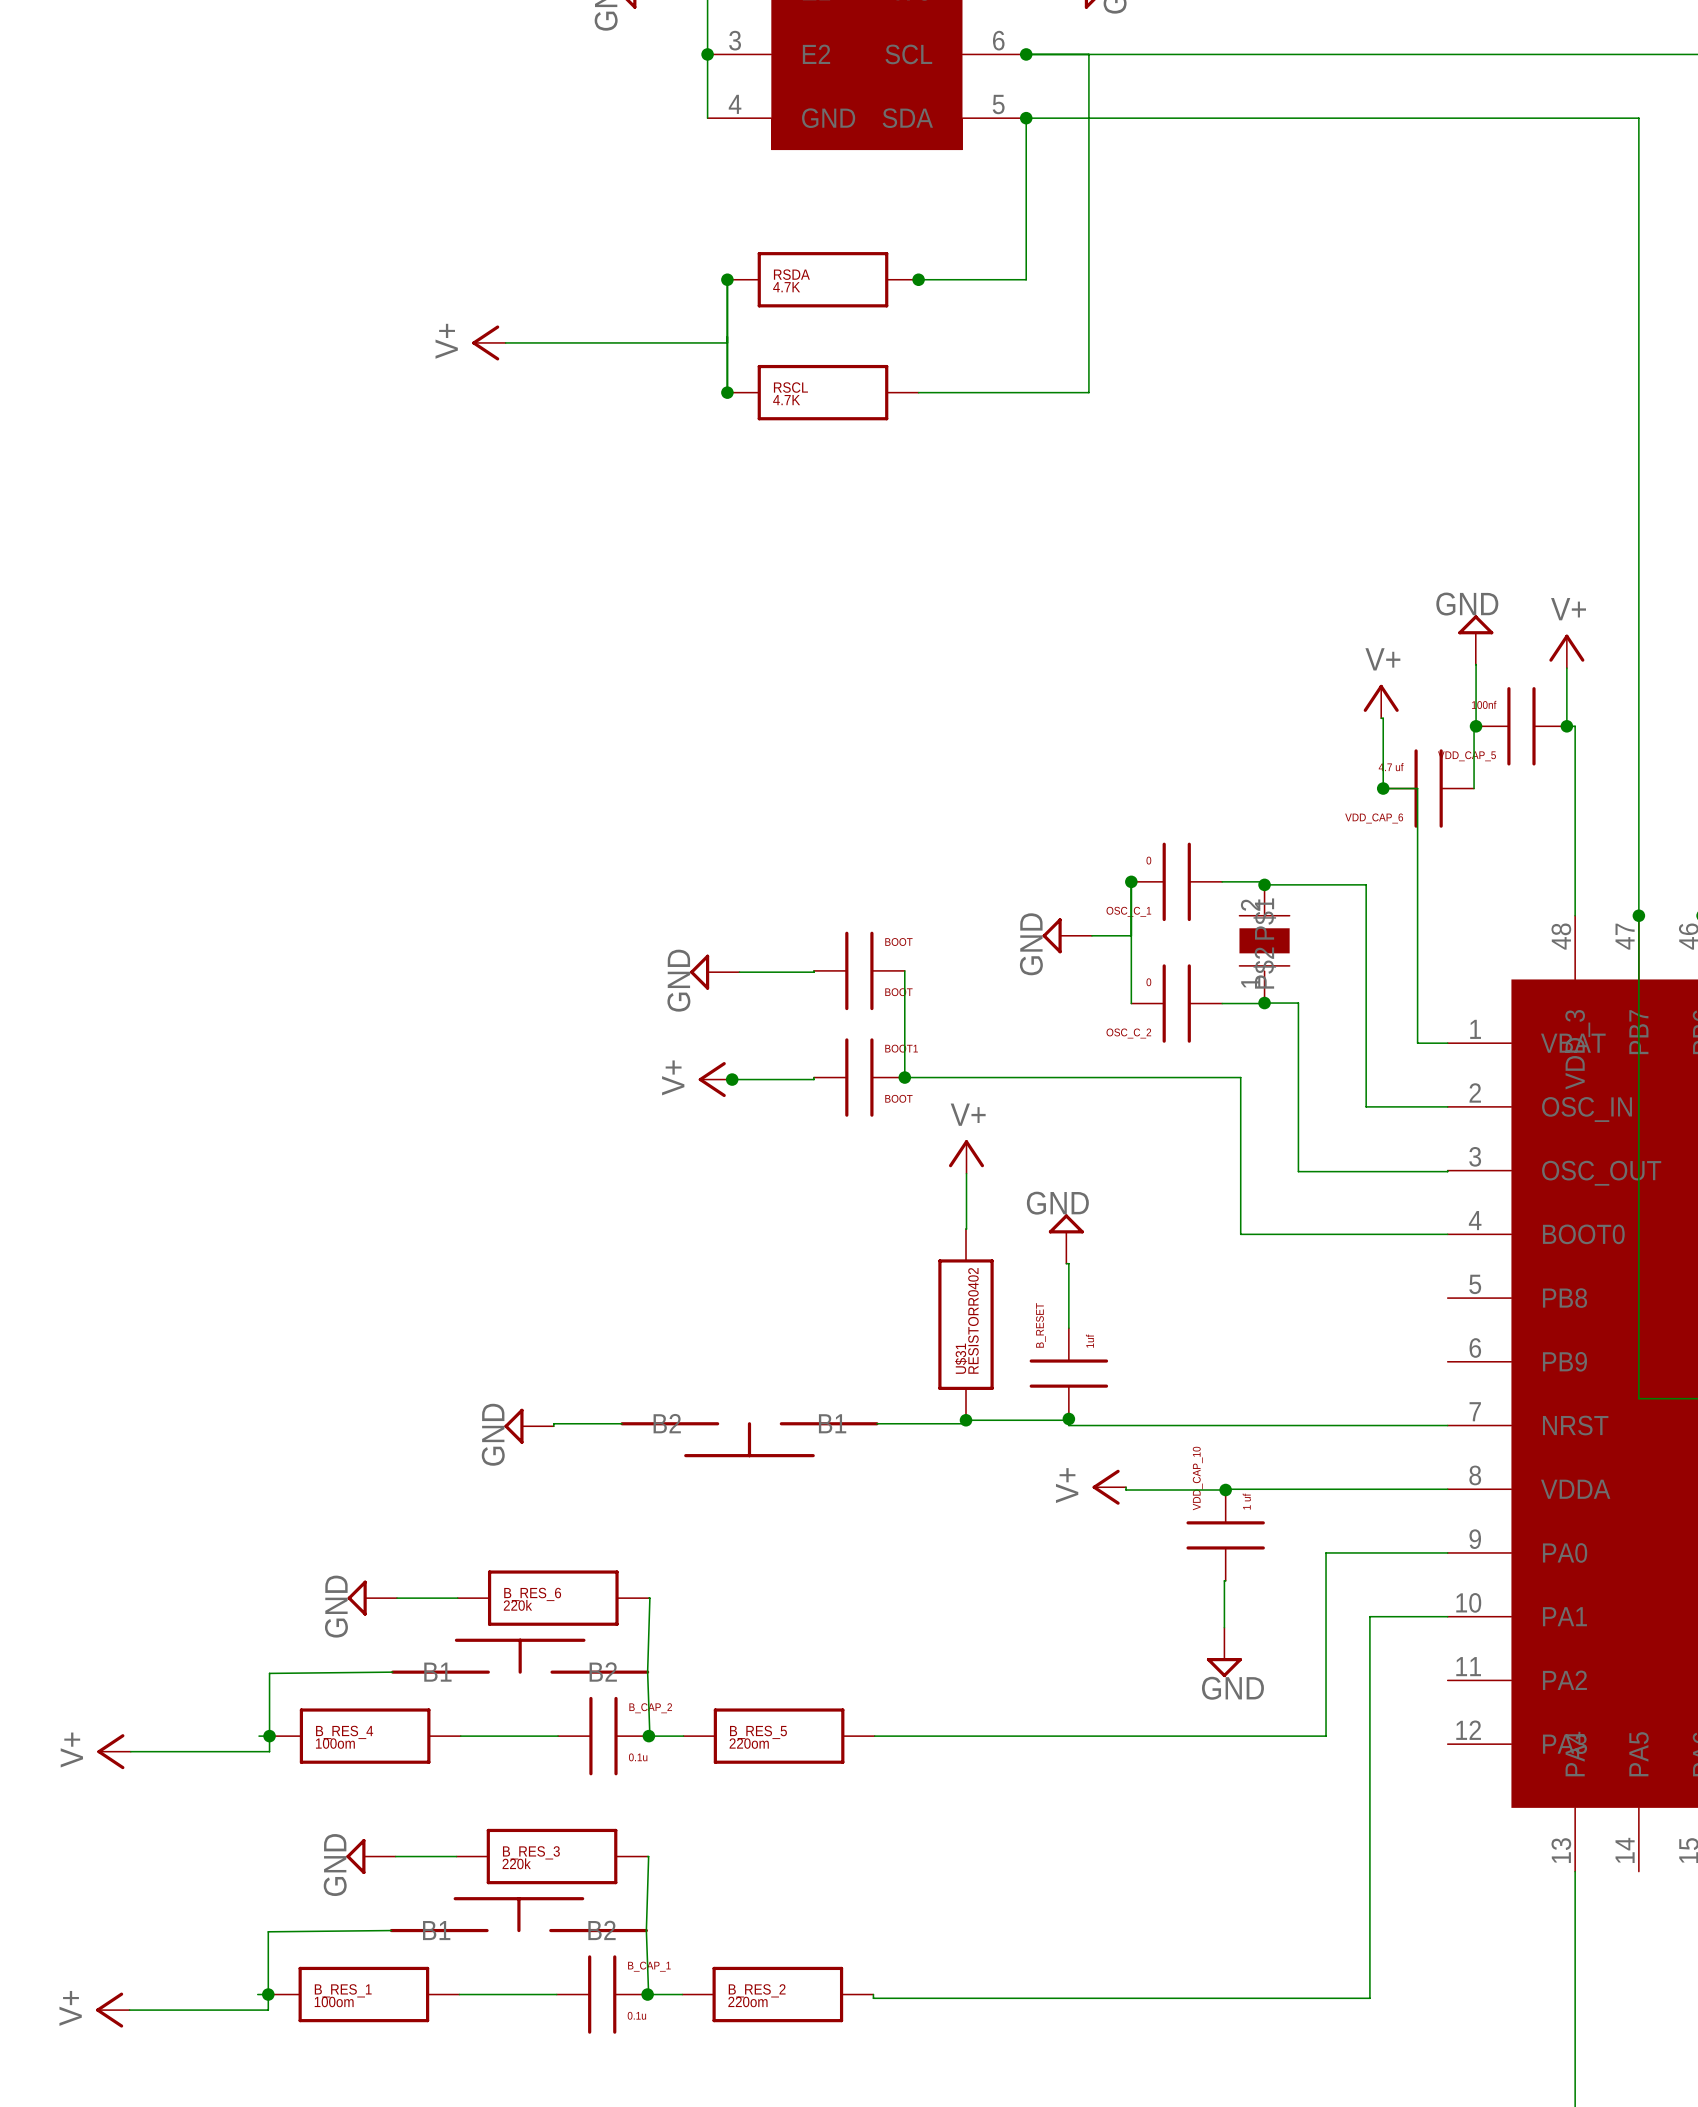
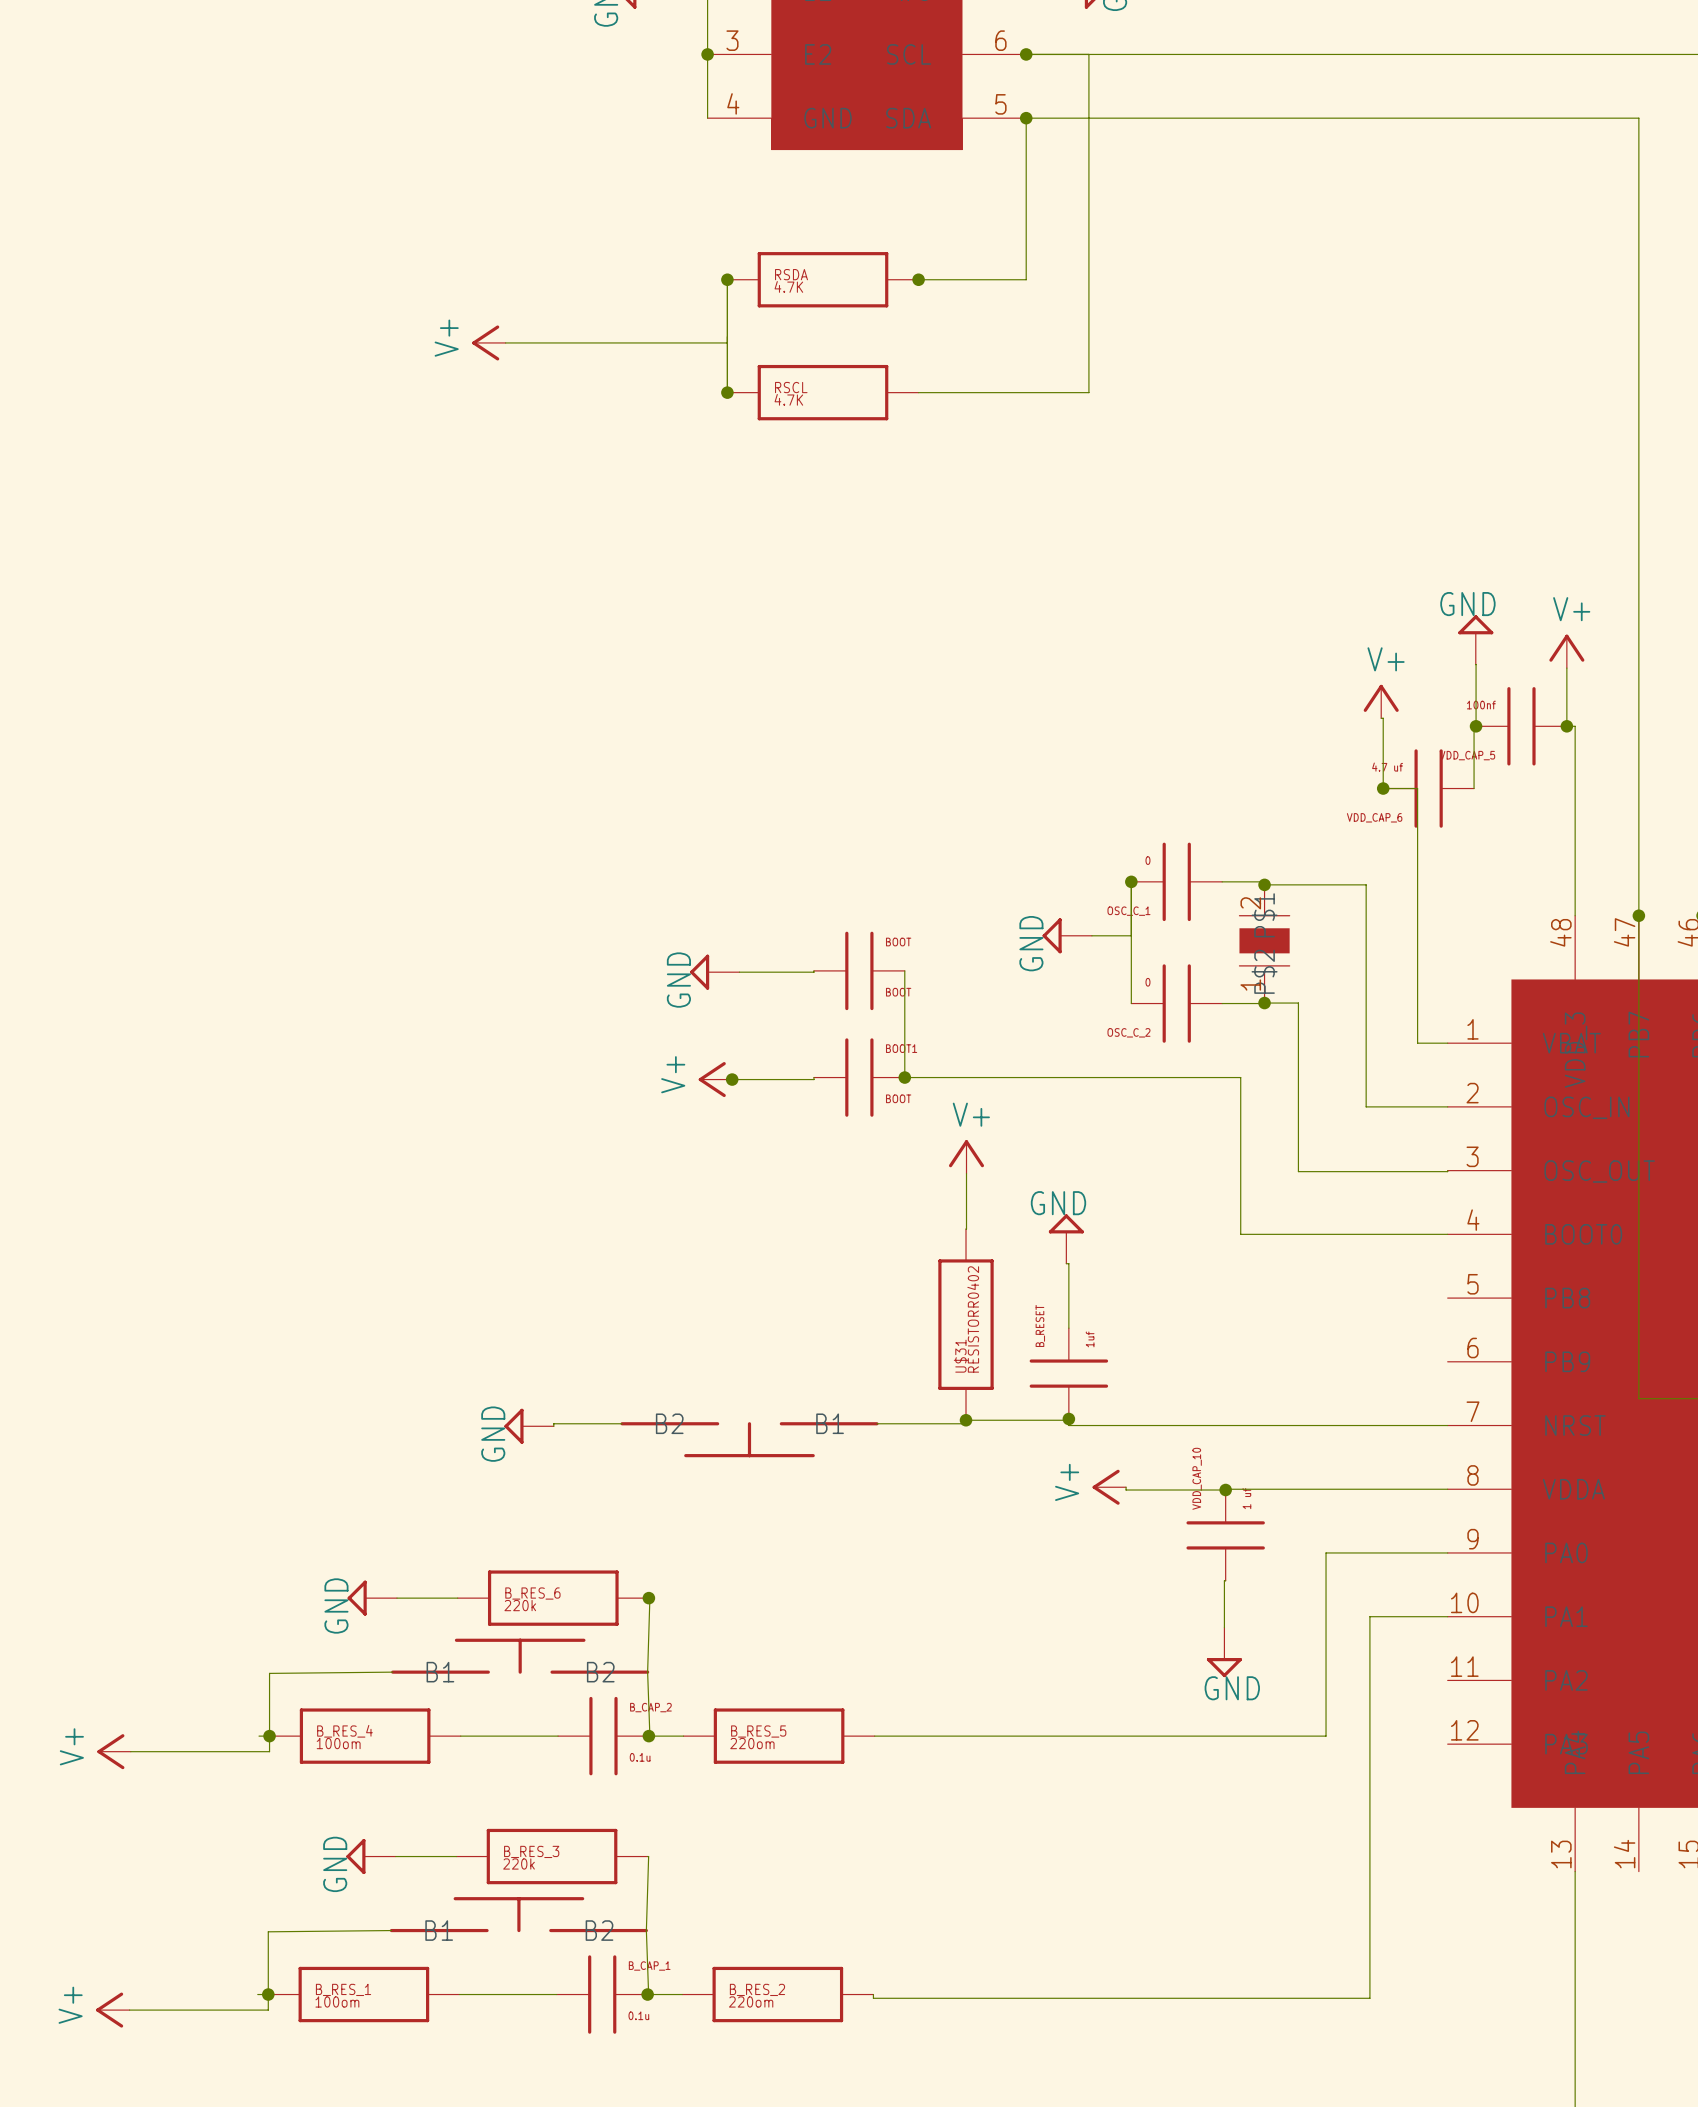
junction: none -> (648, 1598)

